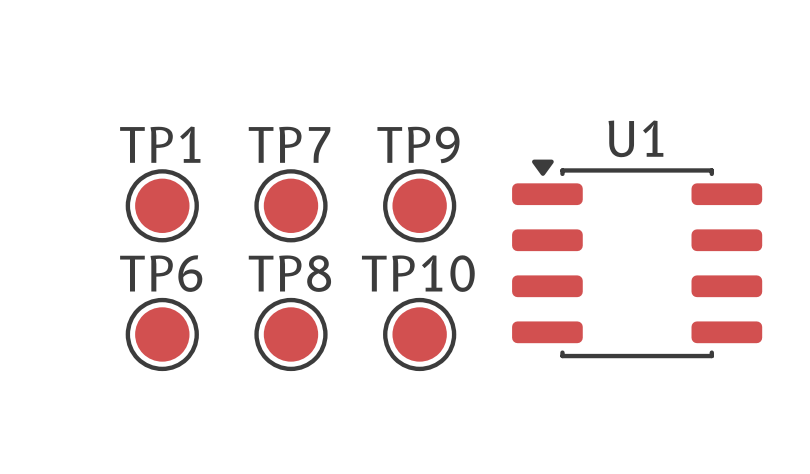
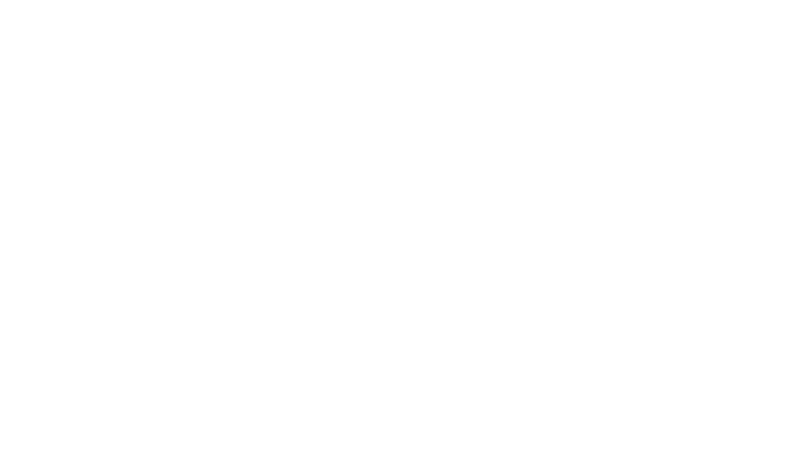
TP1: (162, 205) -> none
TP7: (290, 205) -> none
TP9: (419, 205) -> none
U1: (637, 258) -> none
TP6: (162, 334) -> none
TP8: (290, 334) -> none
TP10: (419, 334) -> none

